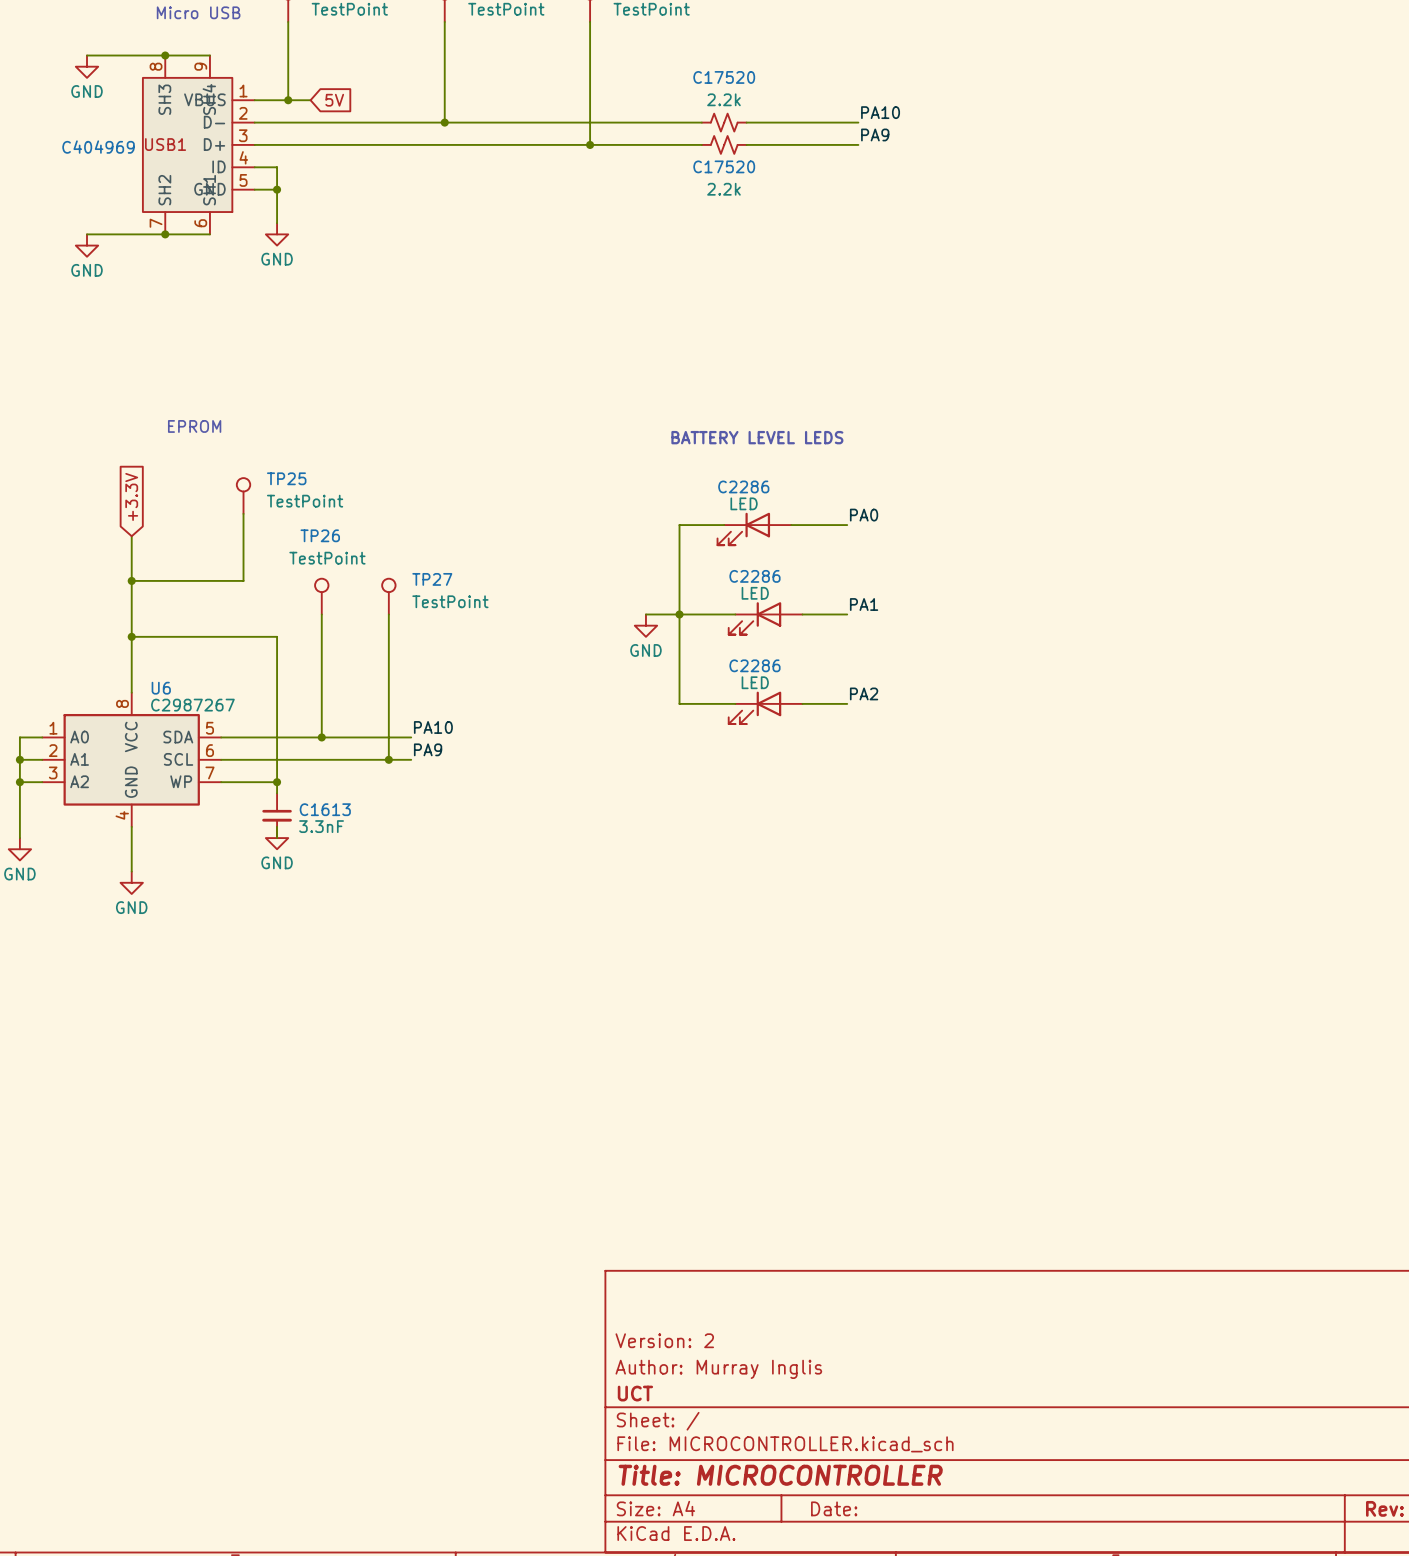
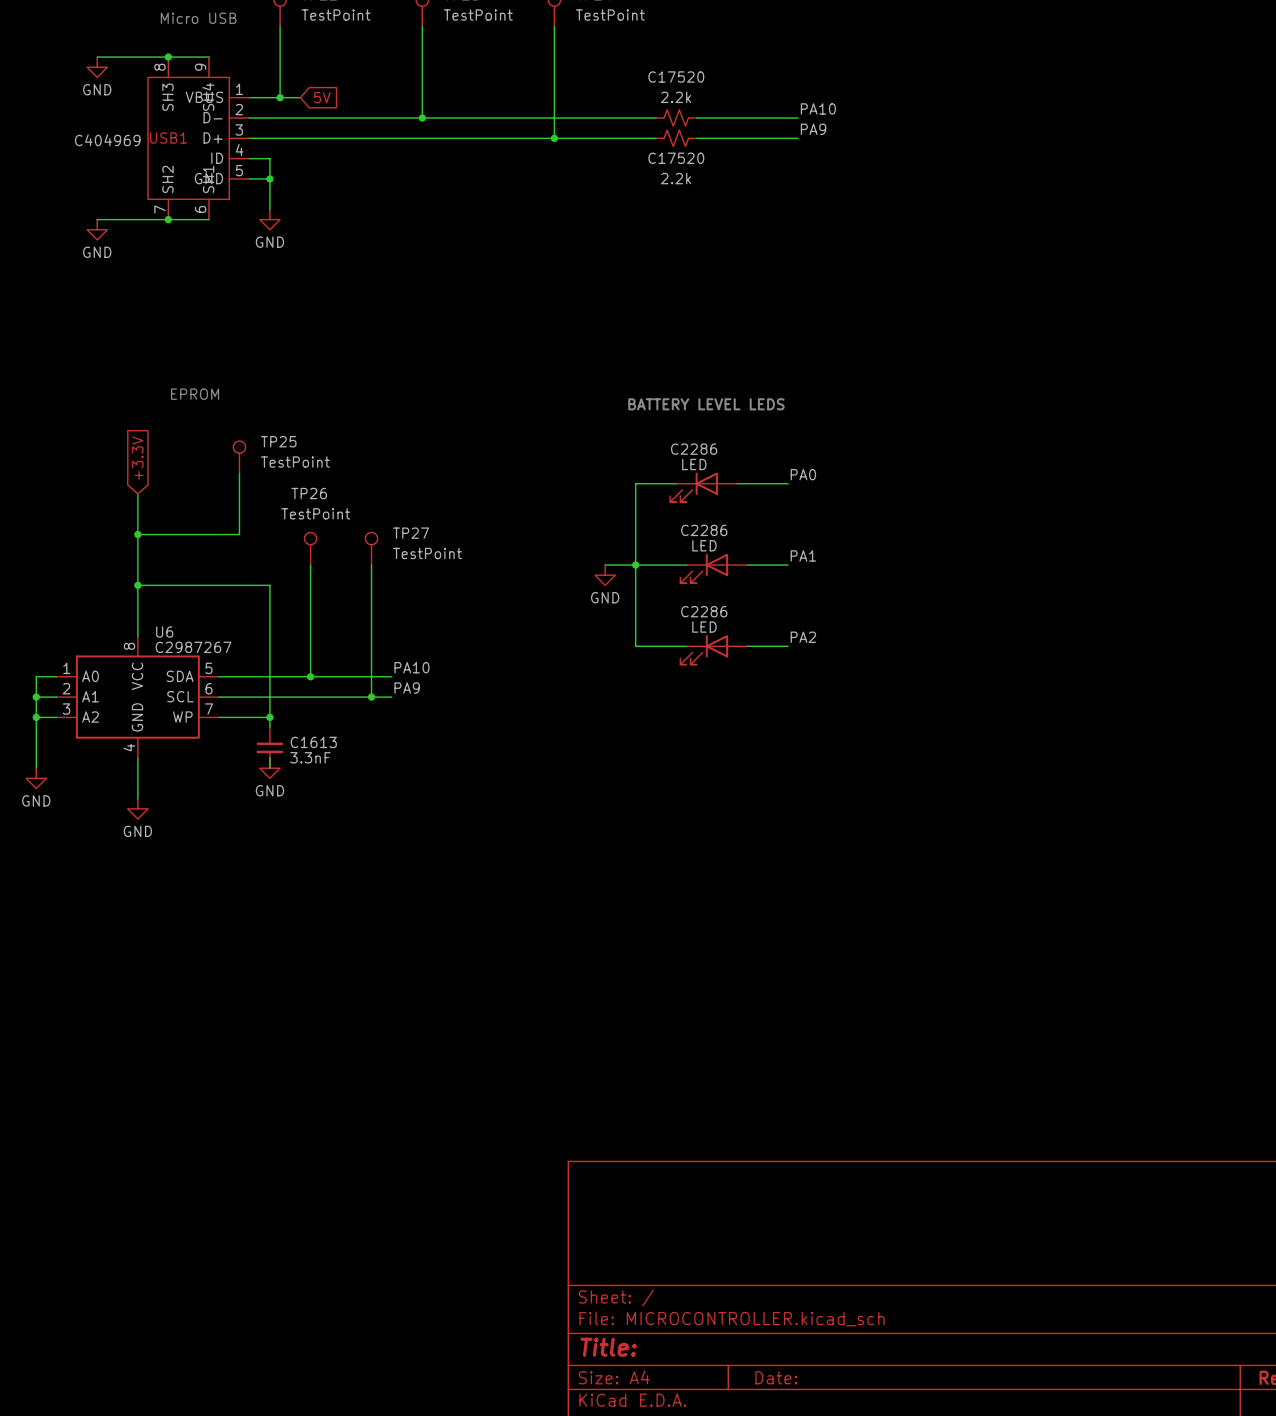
title block: Version: 2 (664, 1340) -> none
title block: Author: Murray Inglis (718, 1369) -> none
title block: UCT (635, 1393) -> none
title block: Title: MICROCONTROLLER (780, 1475) -> Title: (608, 1347)

